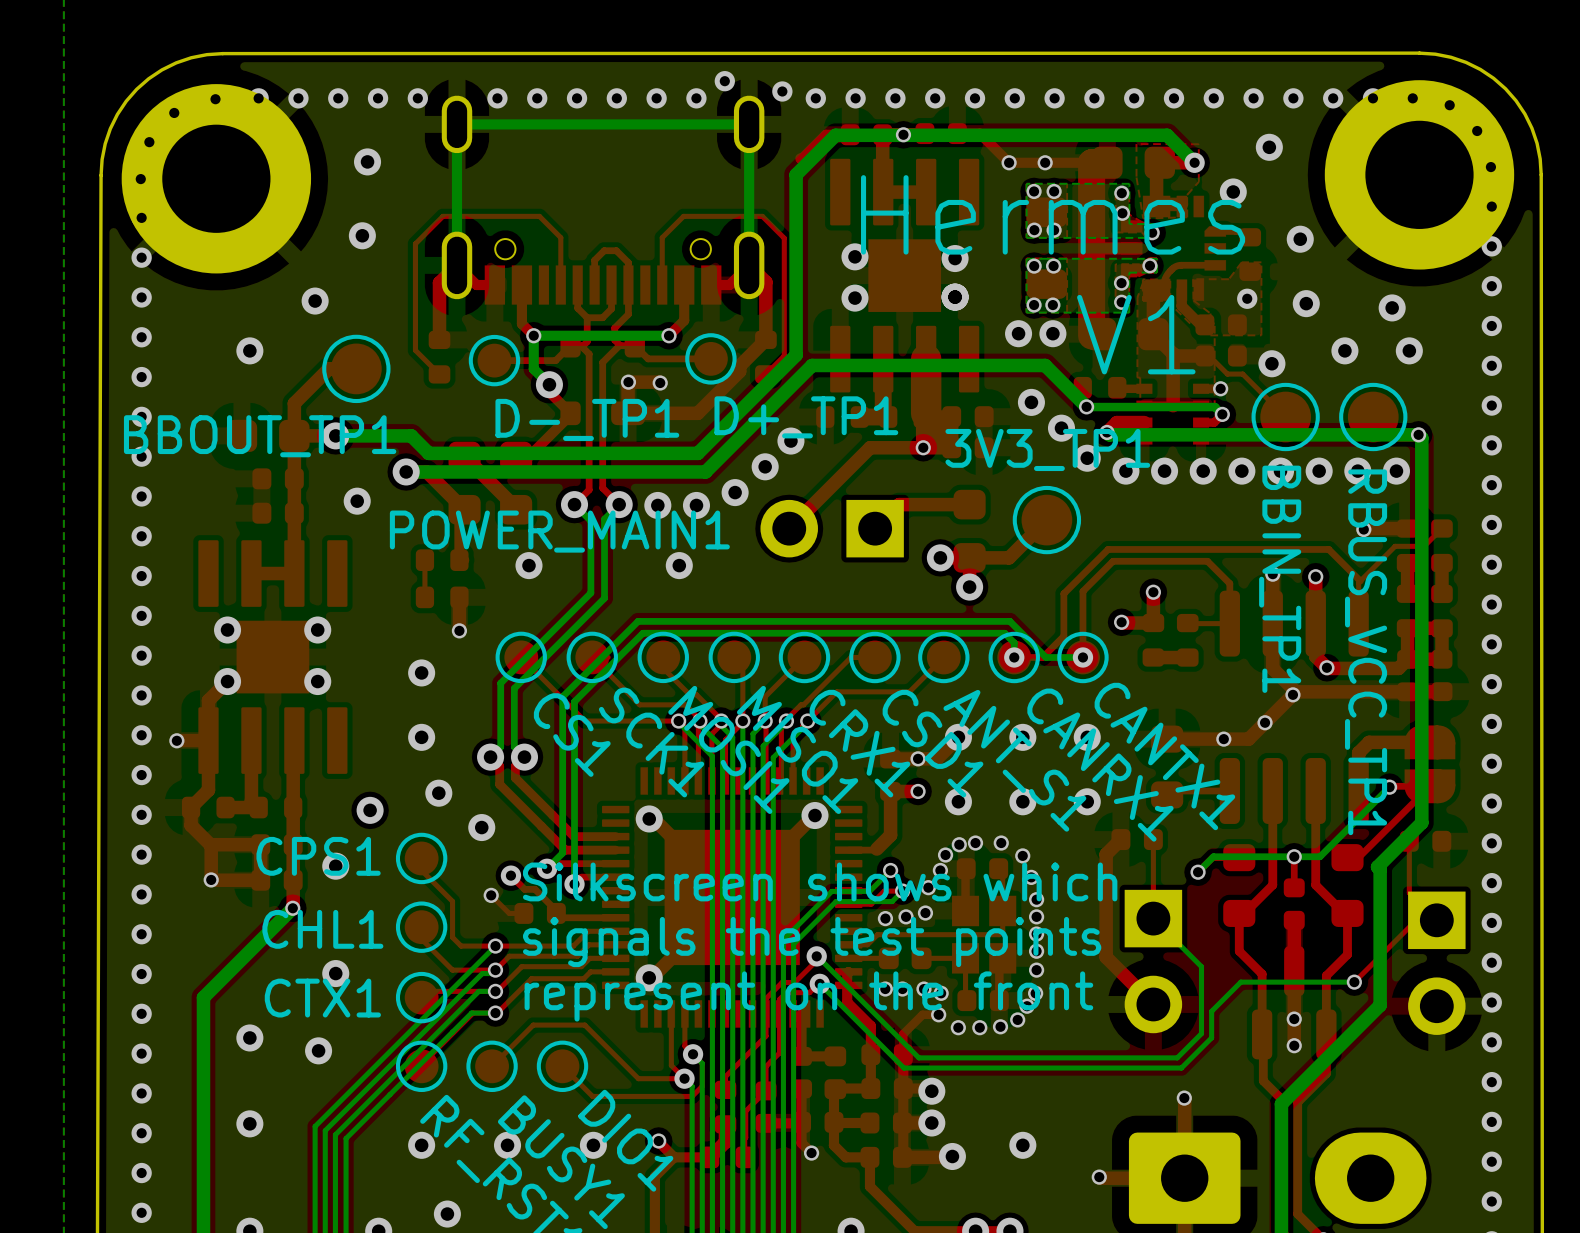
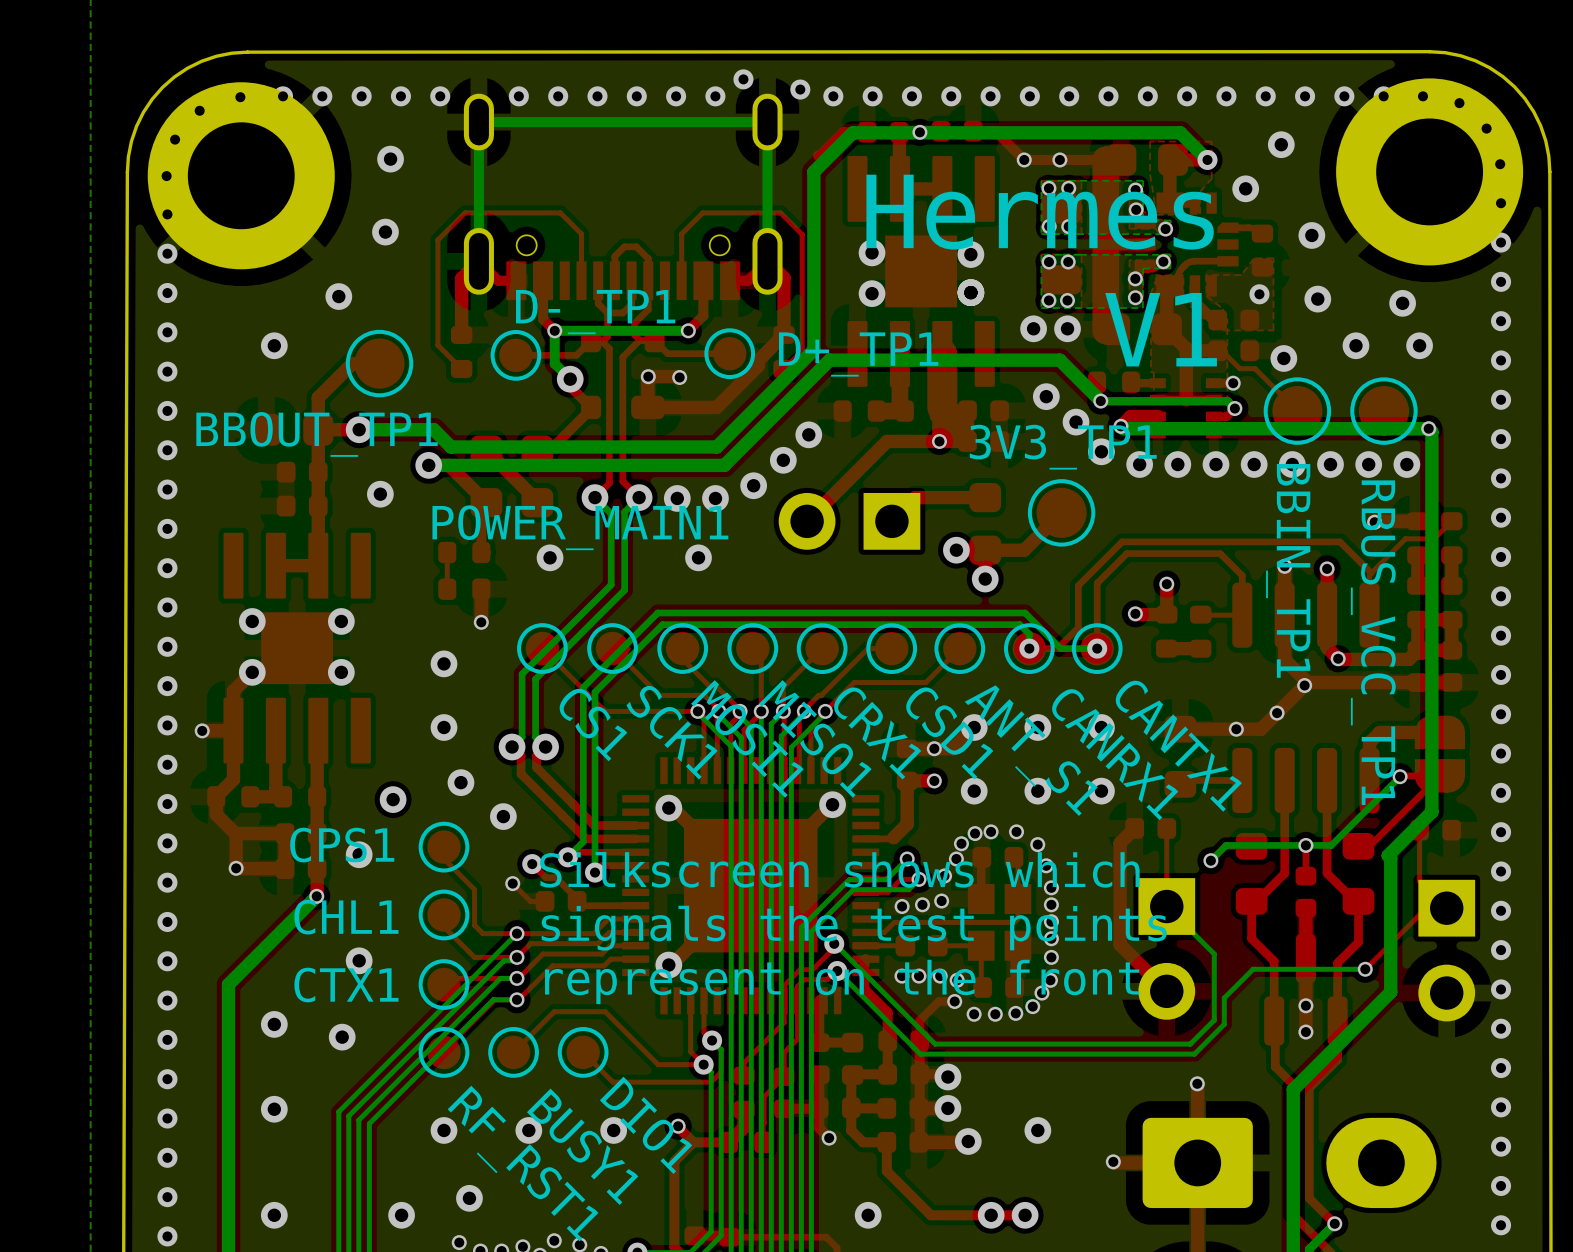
D+_TP1 name position: D+_TP1 (806, 417) -> D+_TP1 (858, 354)
D-_TP1 name position: D-_TP1 (587, 419) -> D-_TP1 (595, 312)
BBOUT_TP1 name position: BBOUT_TP1 (260, 436) -> BBOUT_TP1 (317, 434)

